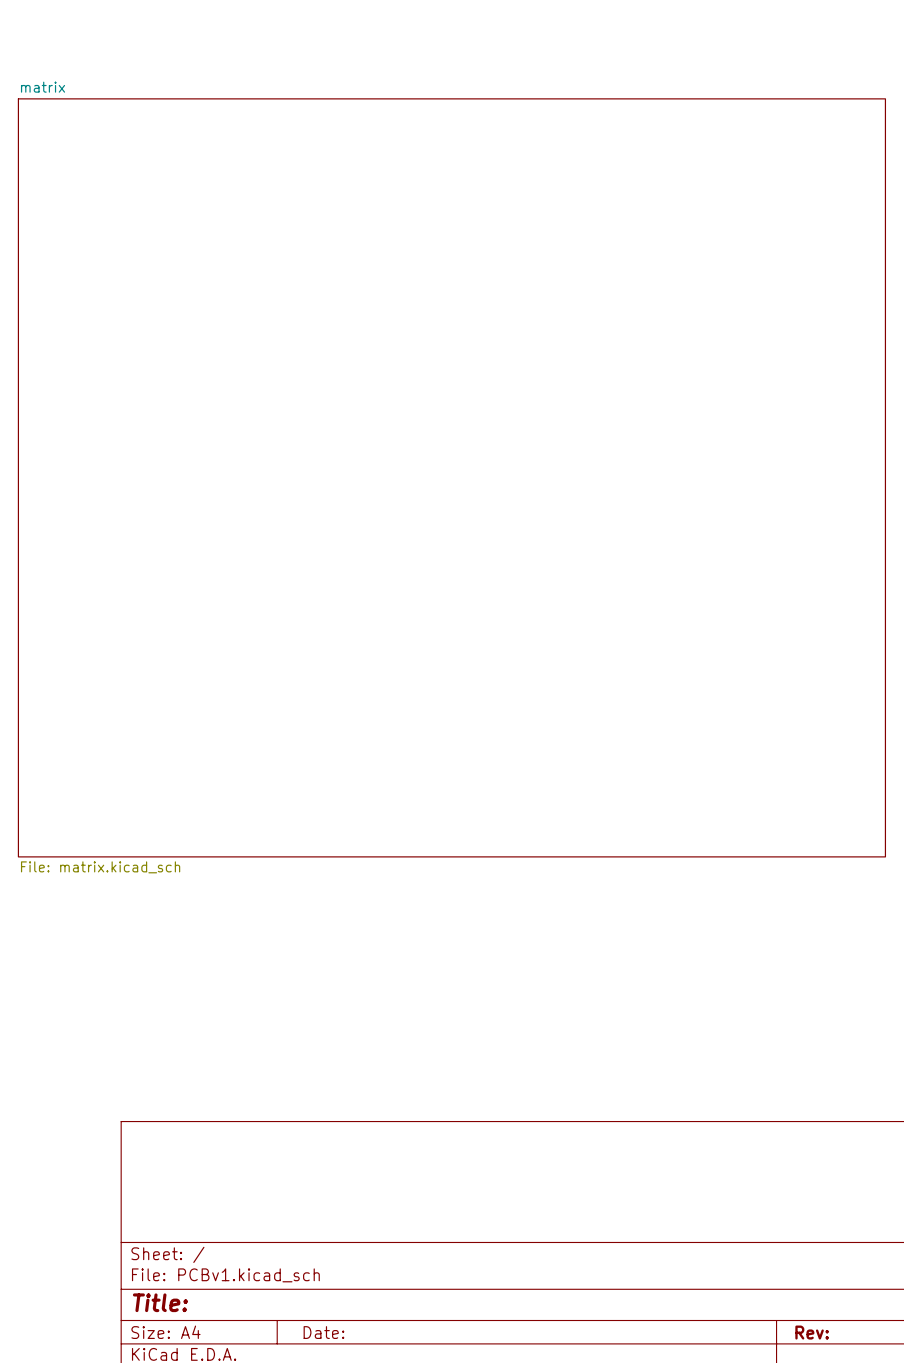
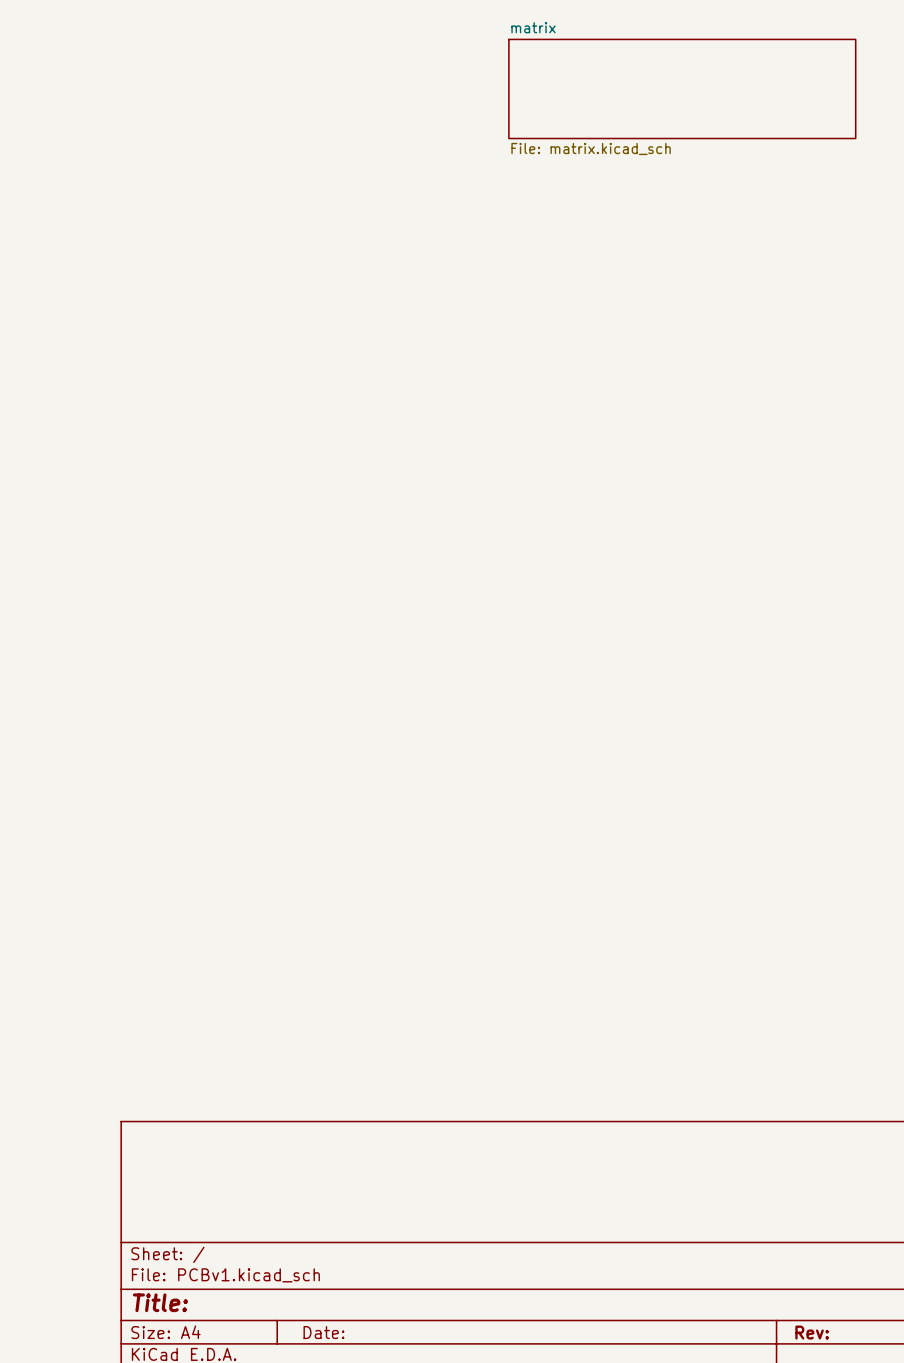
sheet matrix: none -> File: matrix.kicad_sch (682, 88)
sheet matrix: File: matrix.kicad_sch (451, 477) -> none

